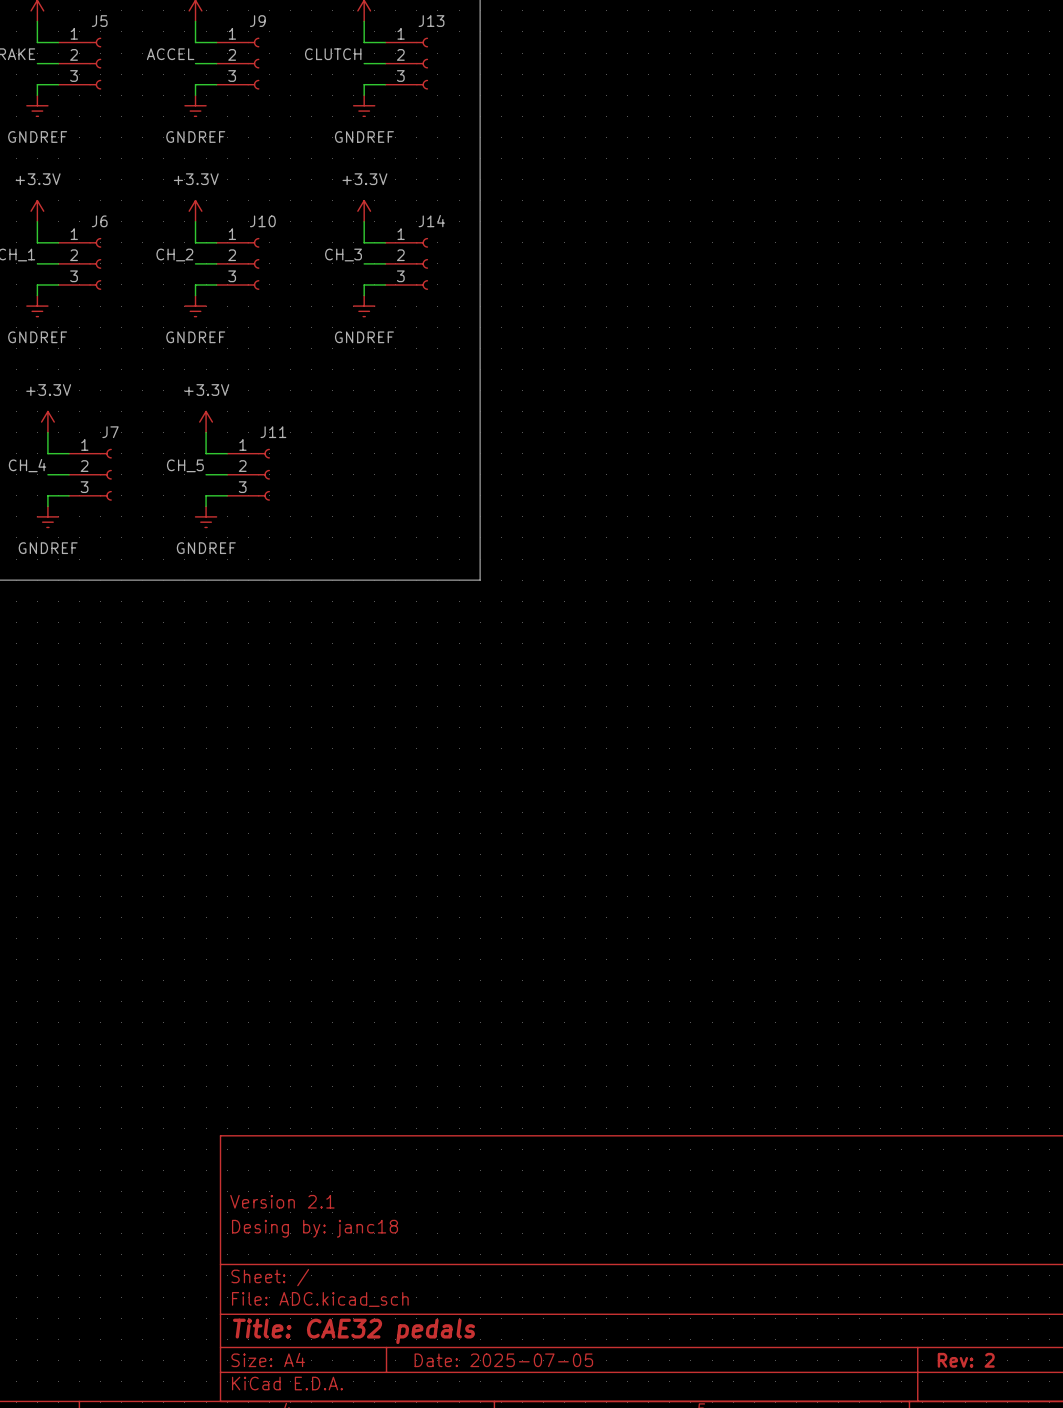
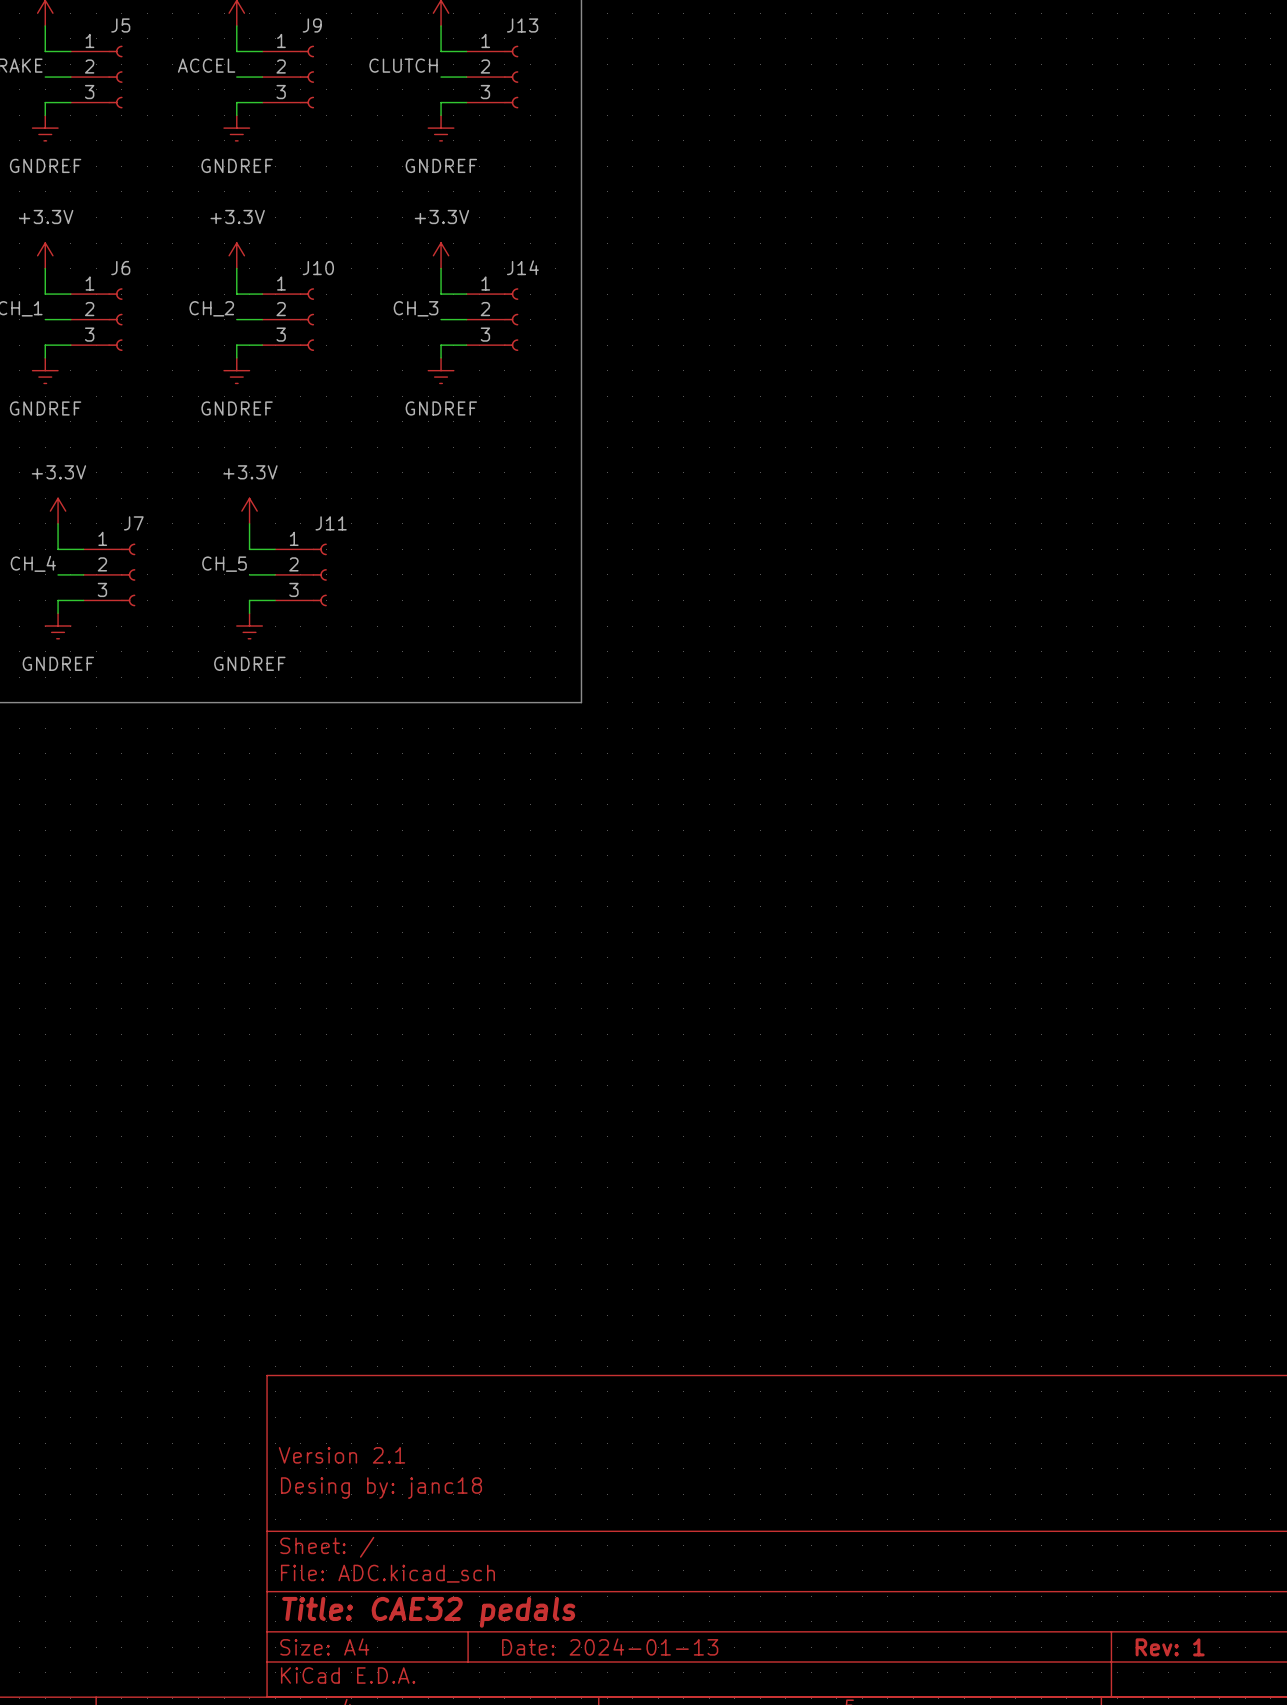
title block: Date: 2025-07-05 (503, 1360) -> Date: 2024-01-13 (610, 1647)
title block: Rev: 2 (966, 1360) -> Rev: 1 (1170, 1647)

